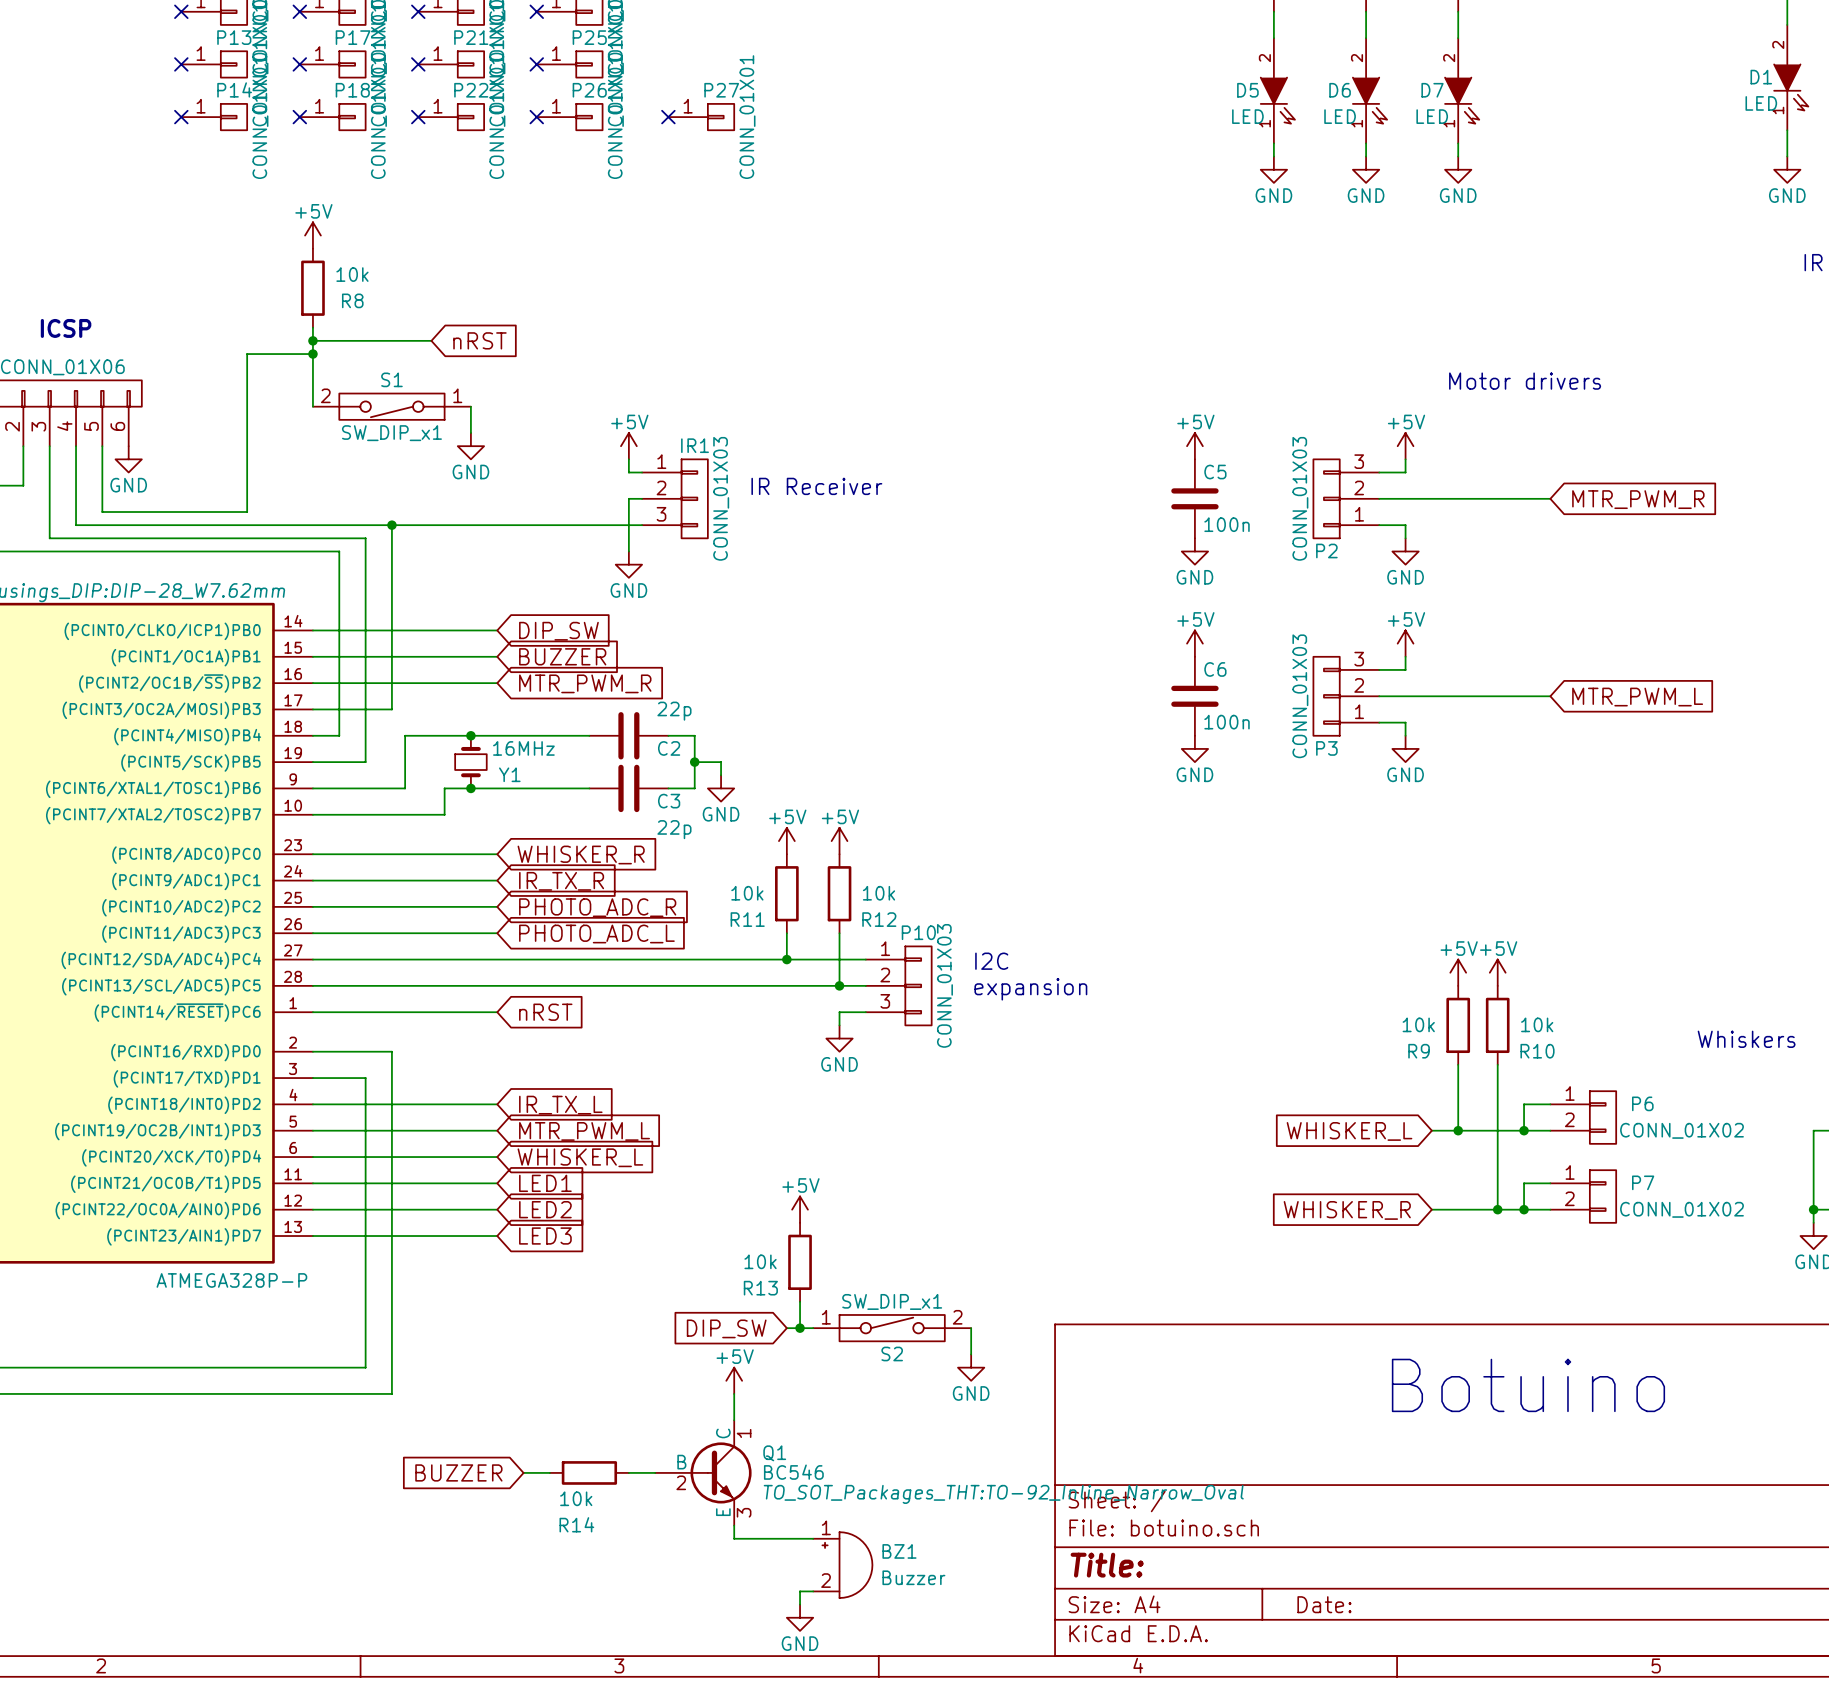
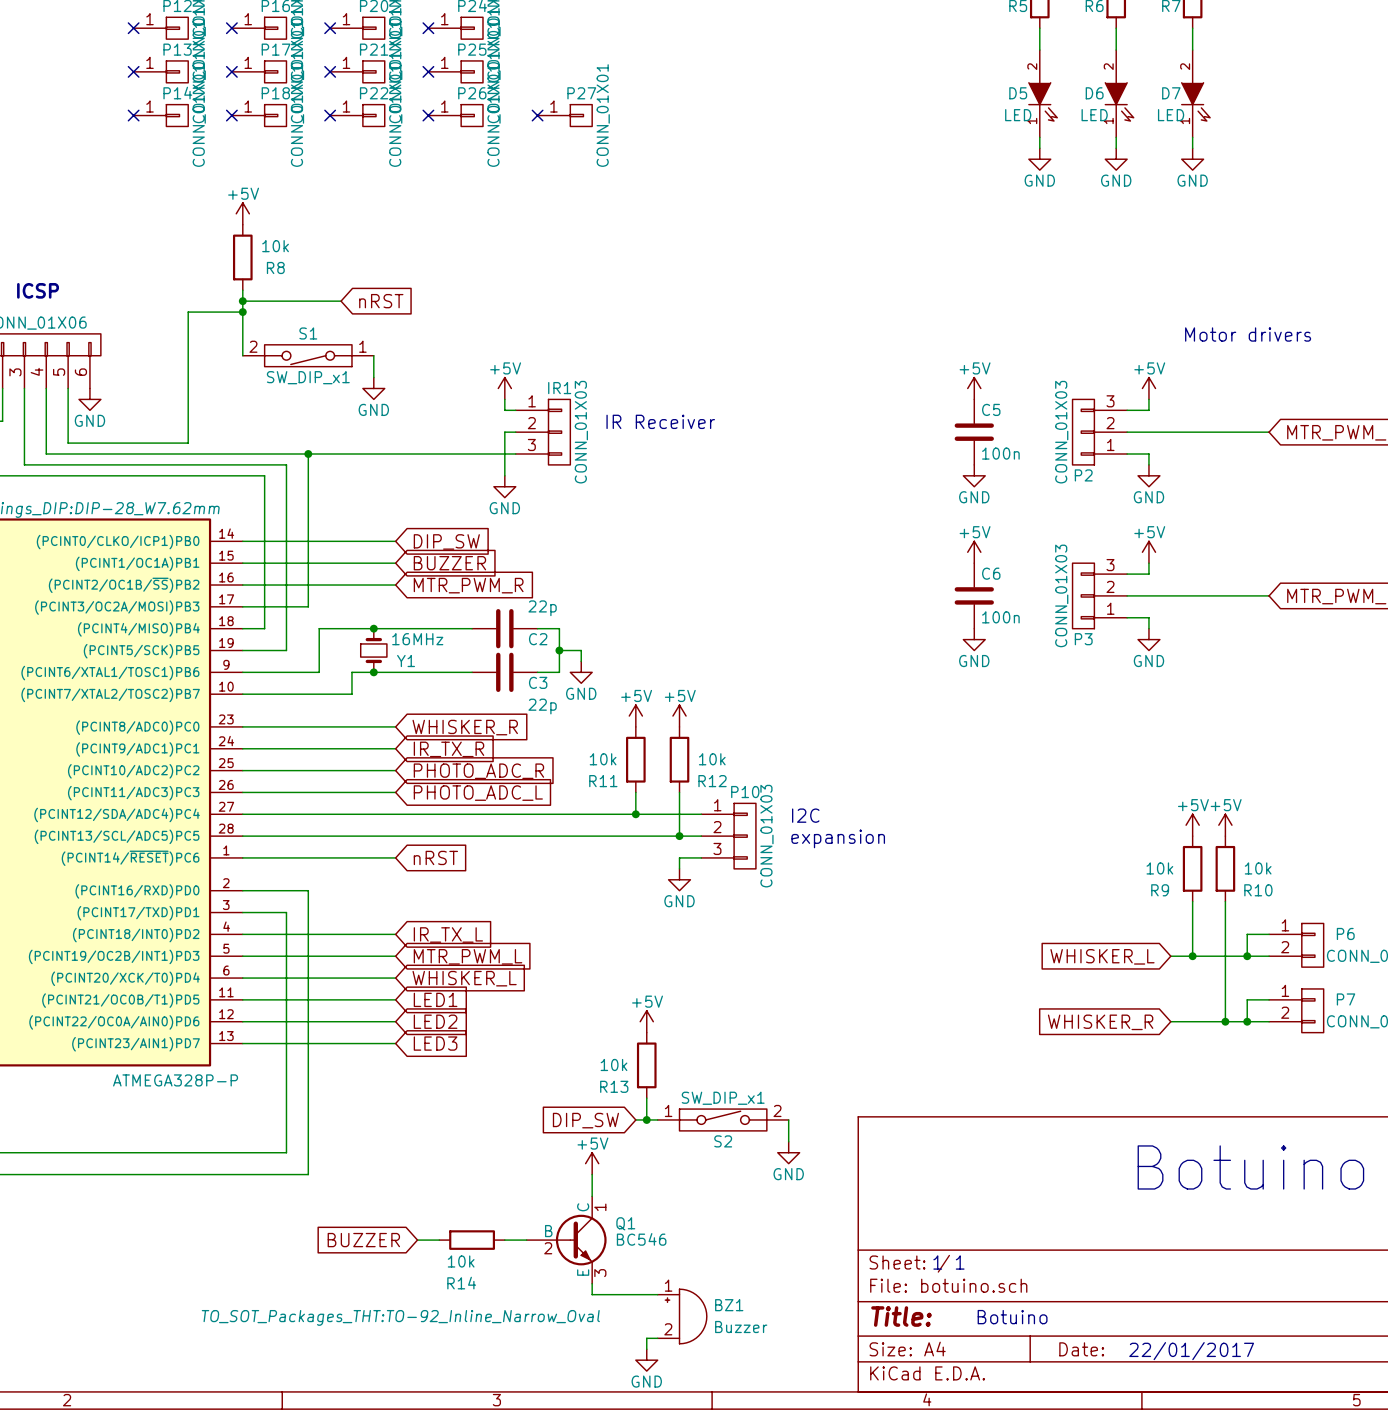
Q1 text position: TO_SOT_Packages_THT:TO-92_Inline_Narrow_Oval (1003, 1494) -> TO_SOT_Packages_THT:TO-92_Inline_Narrow_Oval (400, 1317)
text: none -> 1 1 (948, 1262)
text: none -> Botuino (1012, 1317)
text: none -> 22/01/2017 (1191, 1351)

